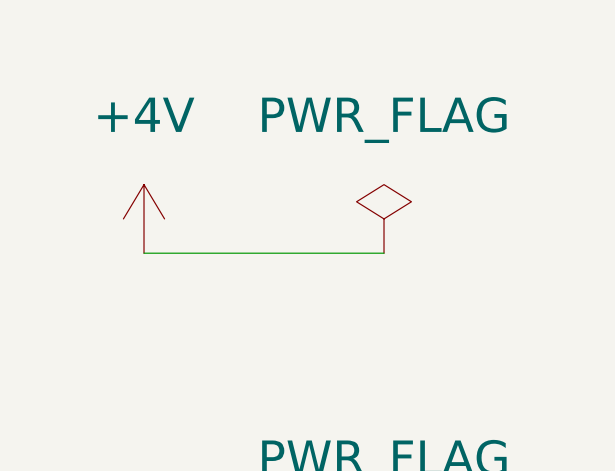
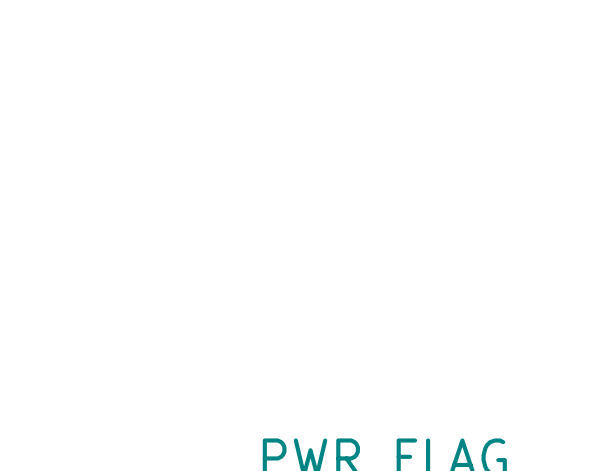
power symbol: +4V (144, 218) -> none
power symbol: PWR_FLAG (384, 218) -> none
wire: (144, 253) (384, 253) -> none

